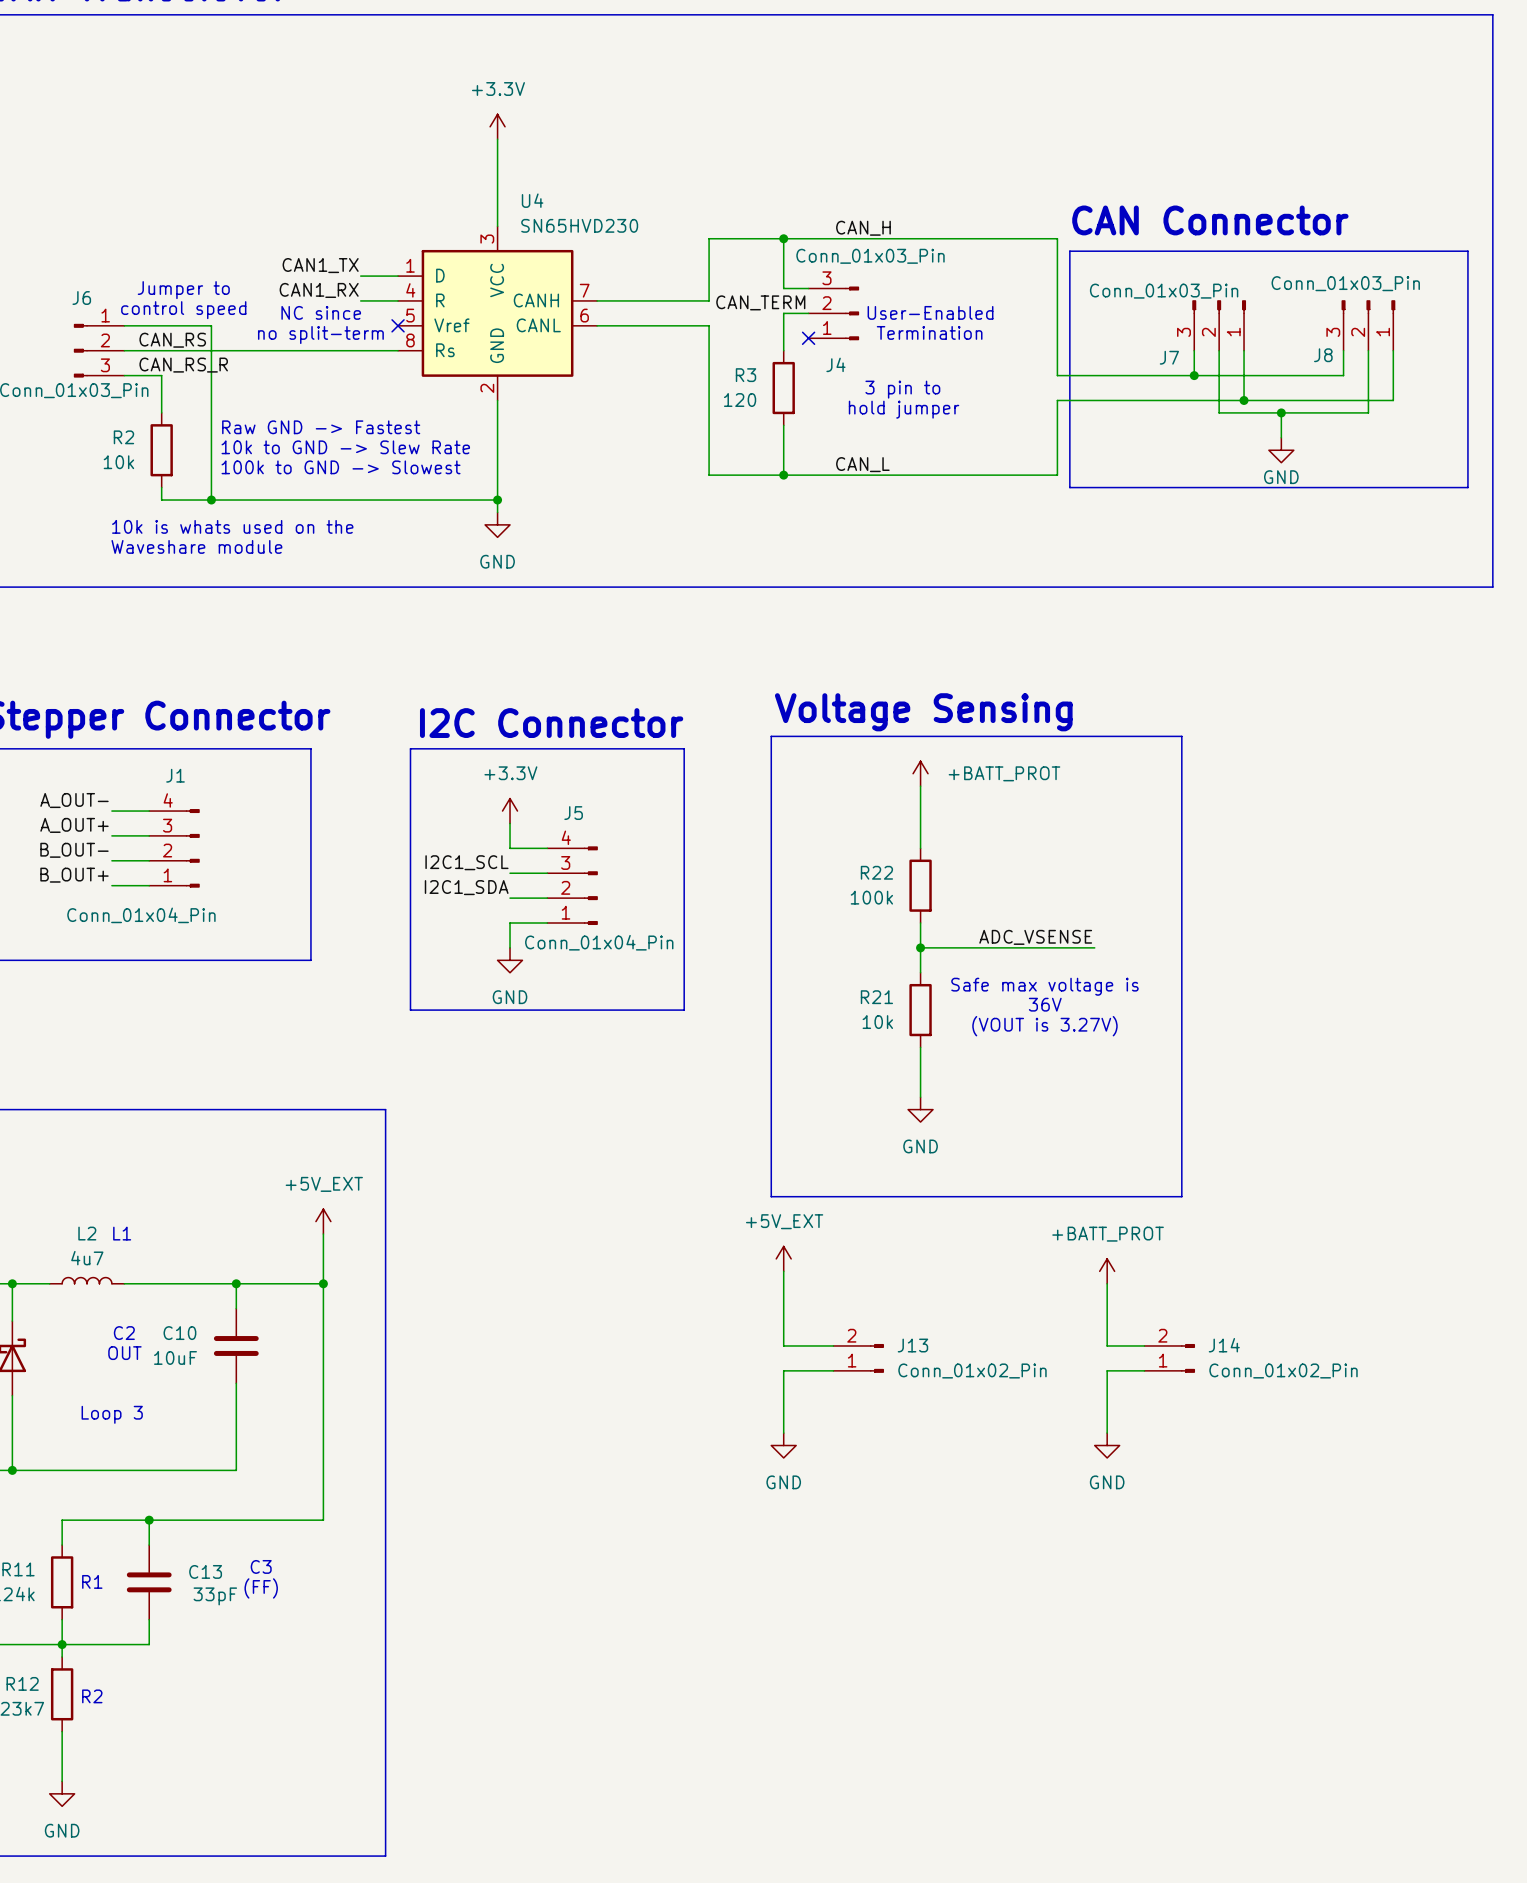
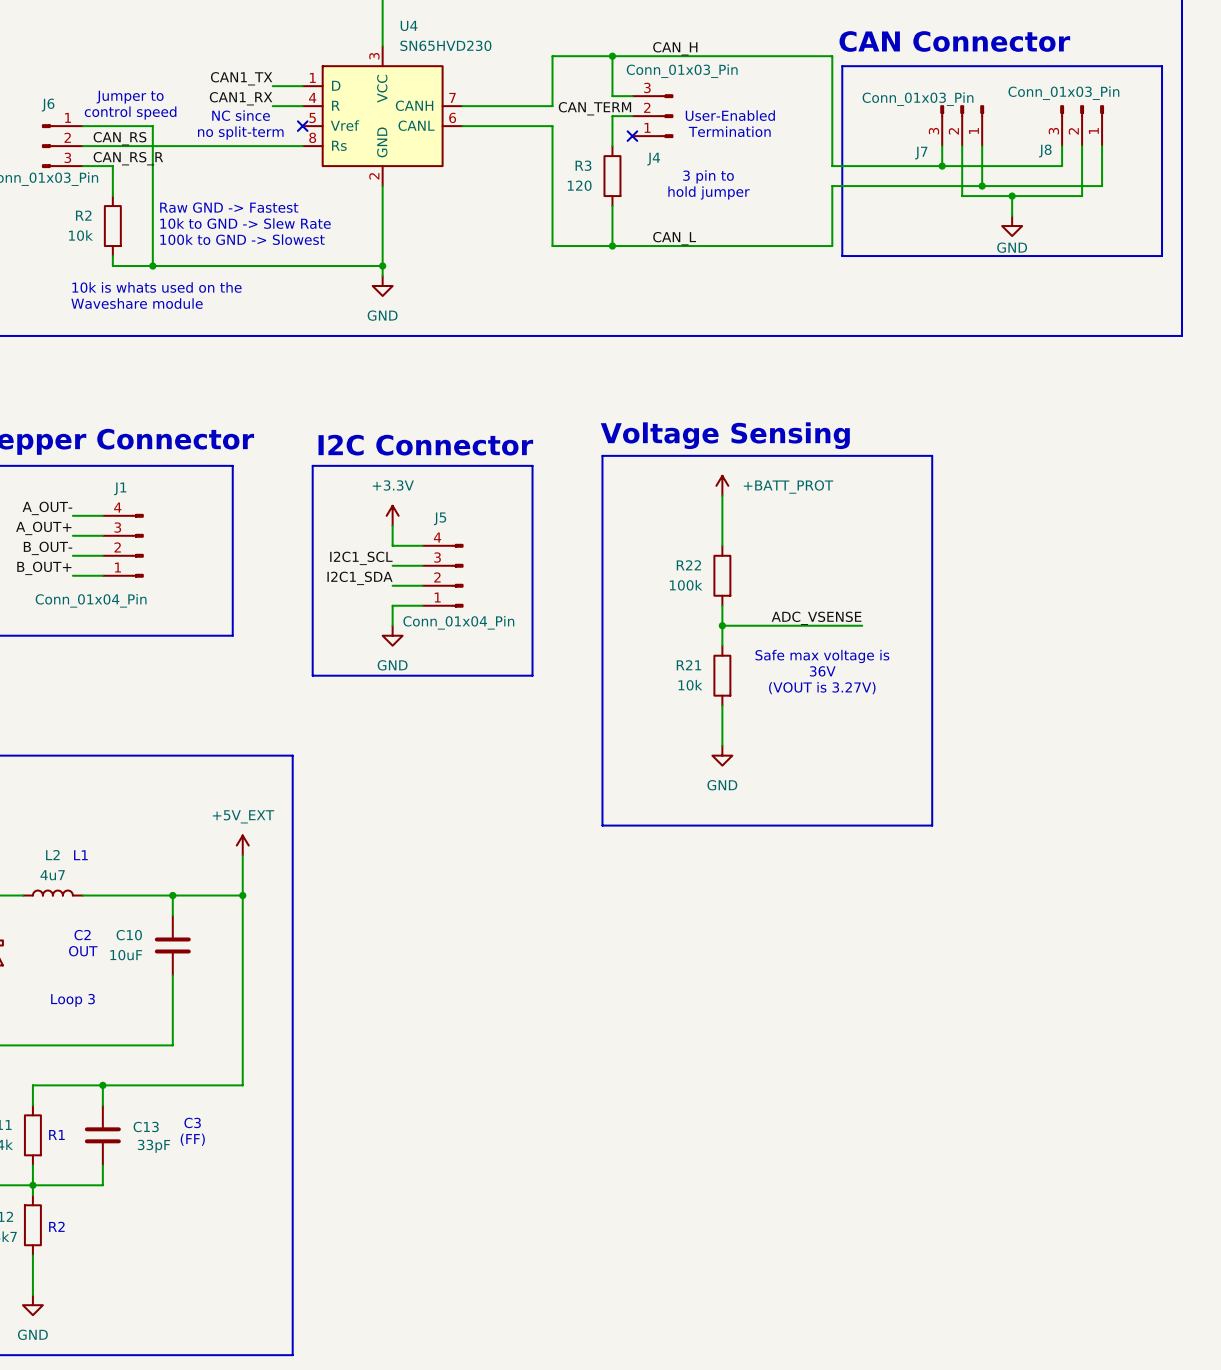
power symbol: +5V_EXT (783, 1258) -> none
wire: (783, 1271) (783, 1345) (833, 1345) -> none
power symbol: +BATT_PROT (1107, 1271) -> none
wire: (1107, 1283) (1107, 1345) (1144, 1345) -> none
J13: Conn_01x02_Pin (858, 1358) -> none
J14: Conn_01x02_Pin (1169, 1358) -> none
wire: (833, 1370) (783, 1370) (783, 1433) -> none
wire: (1144, 1370) (1107, 1370) (1107, 1433) -> none
power symbol: GND (783, 1445) -> none
power symbol: GND (1107, 1445) -> none

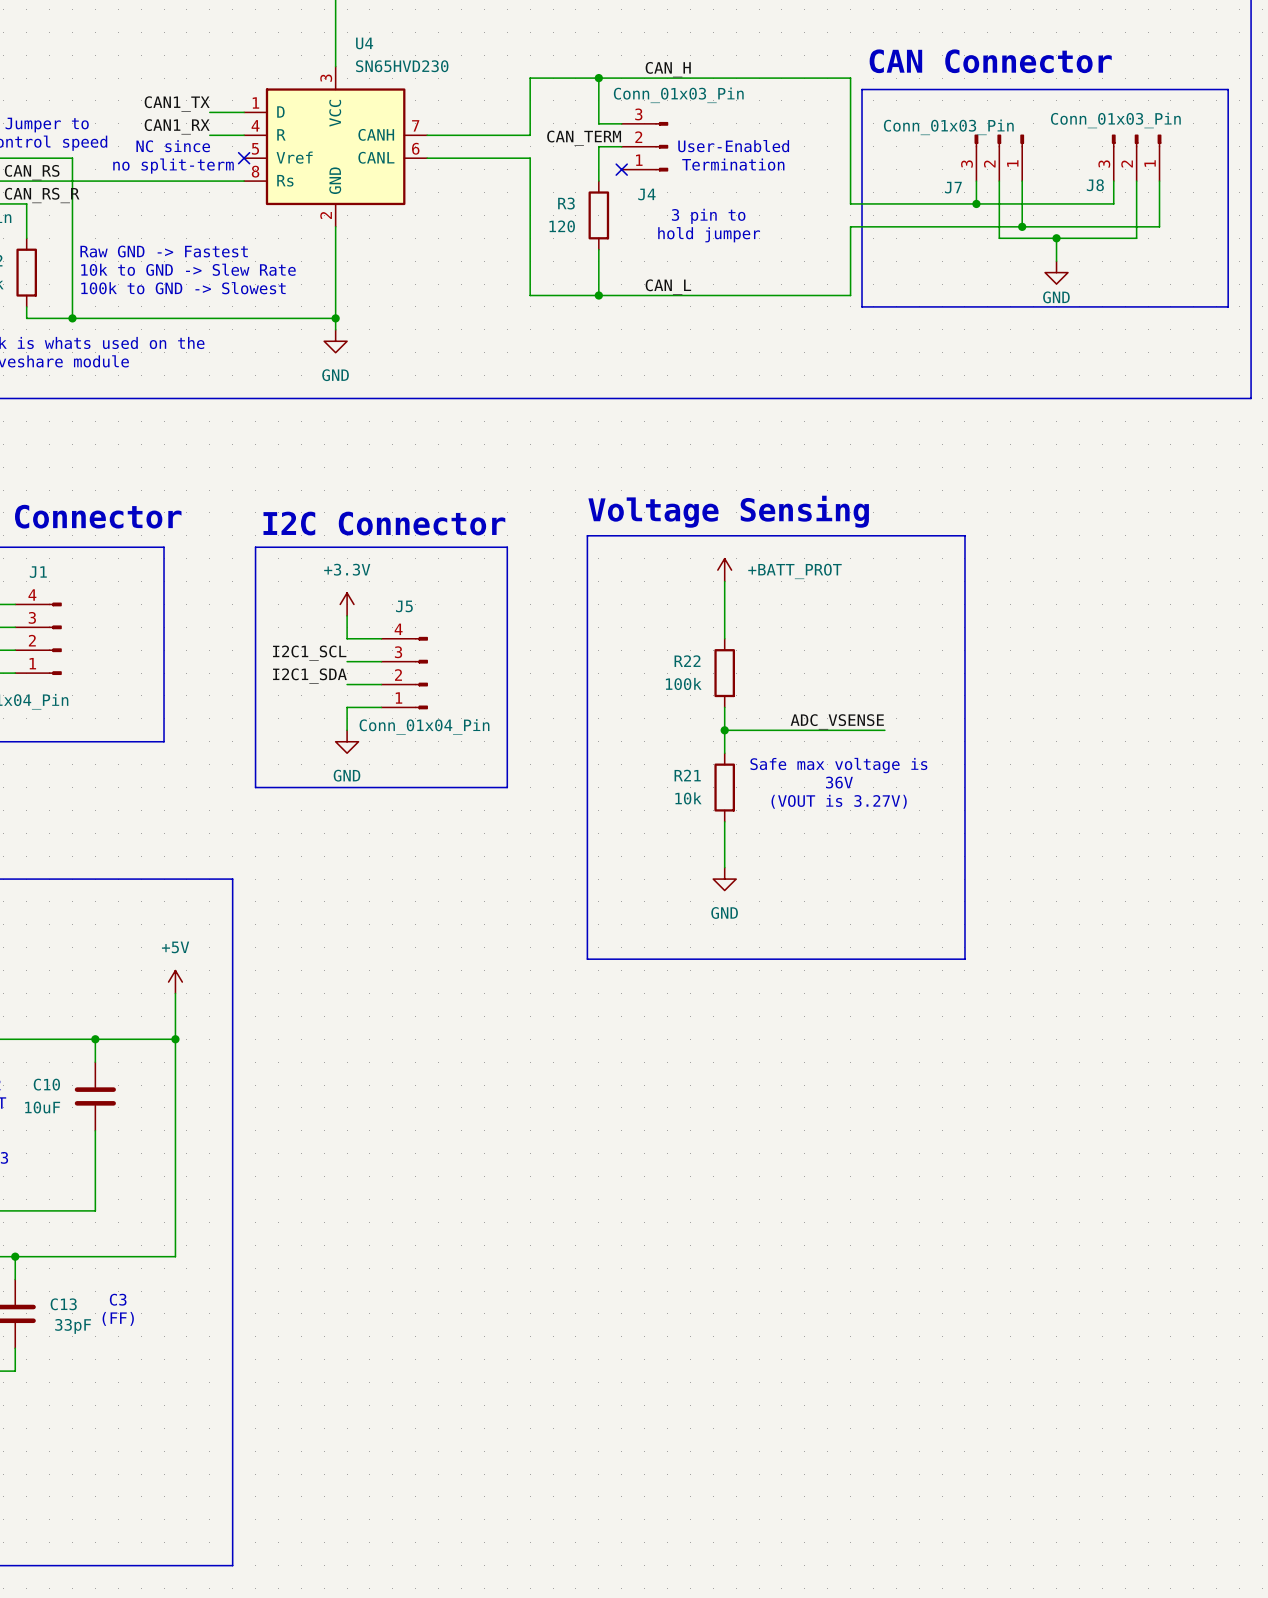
power symbol: +5V_EXT (242, 845) -> +5V (175, 982)

